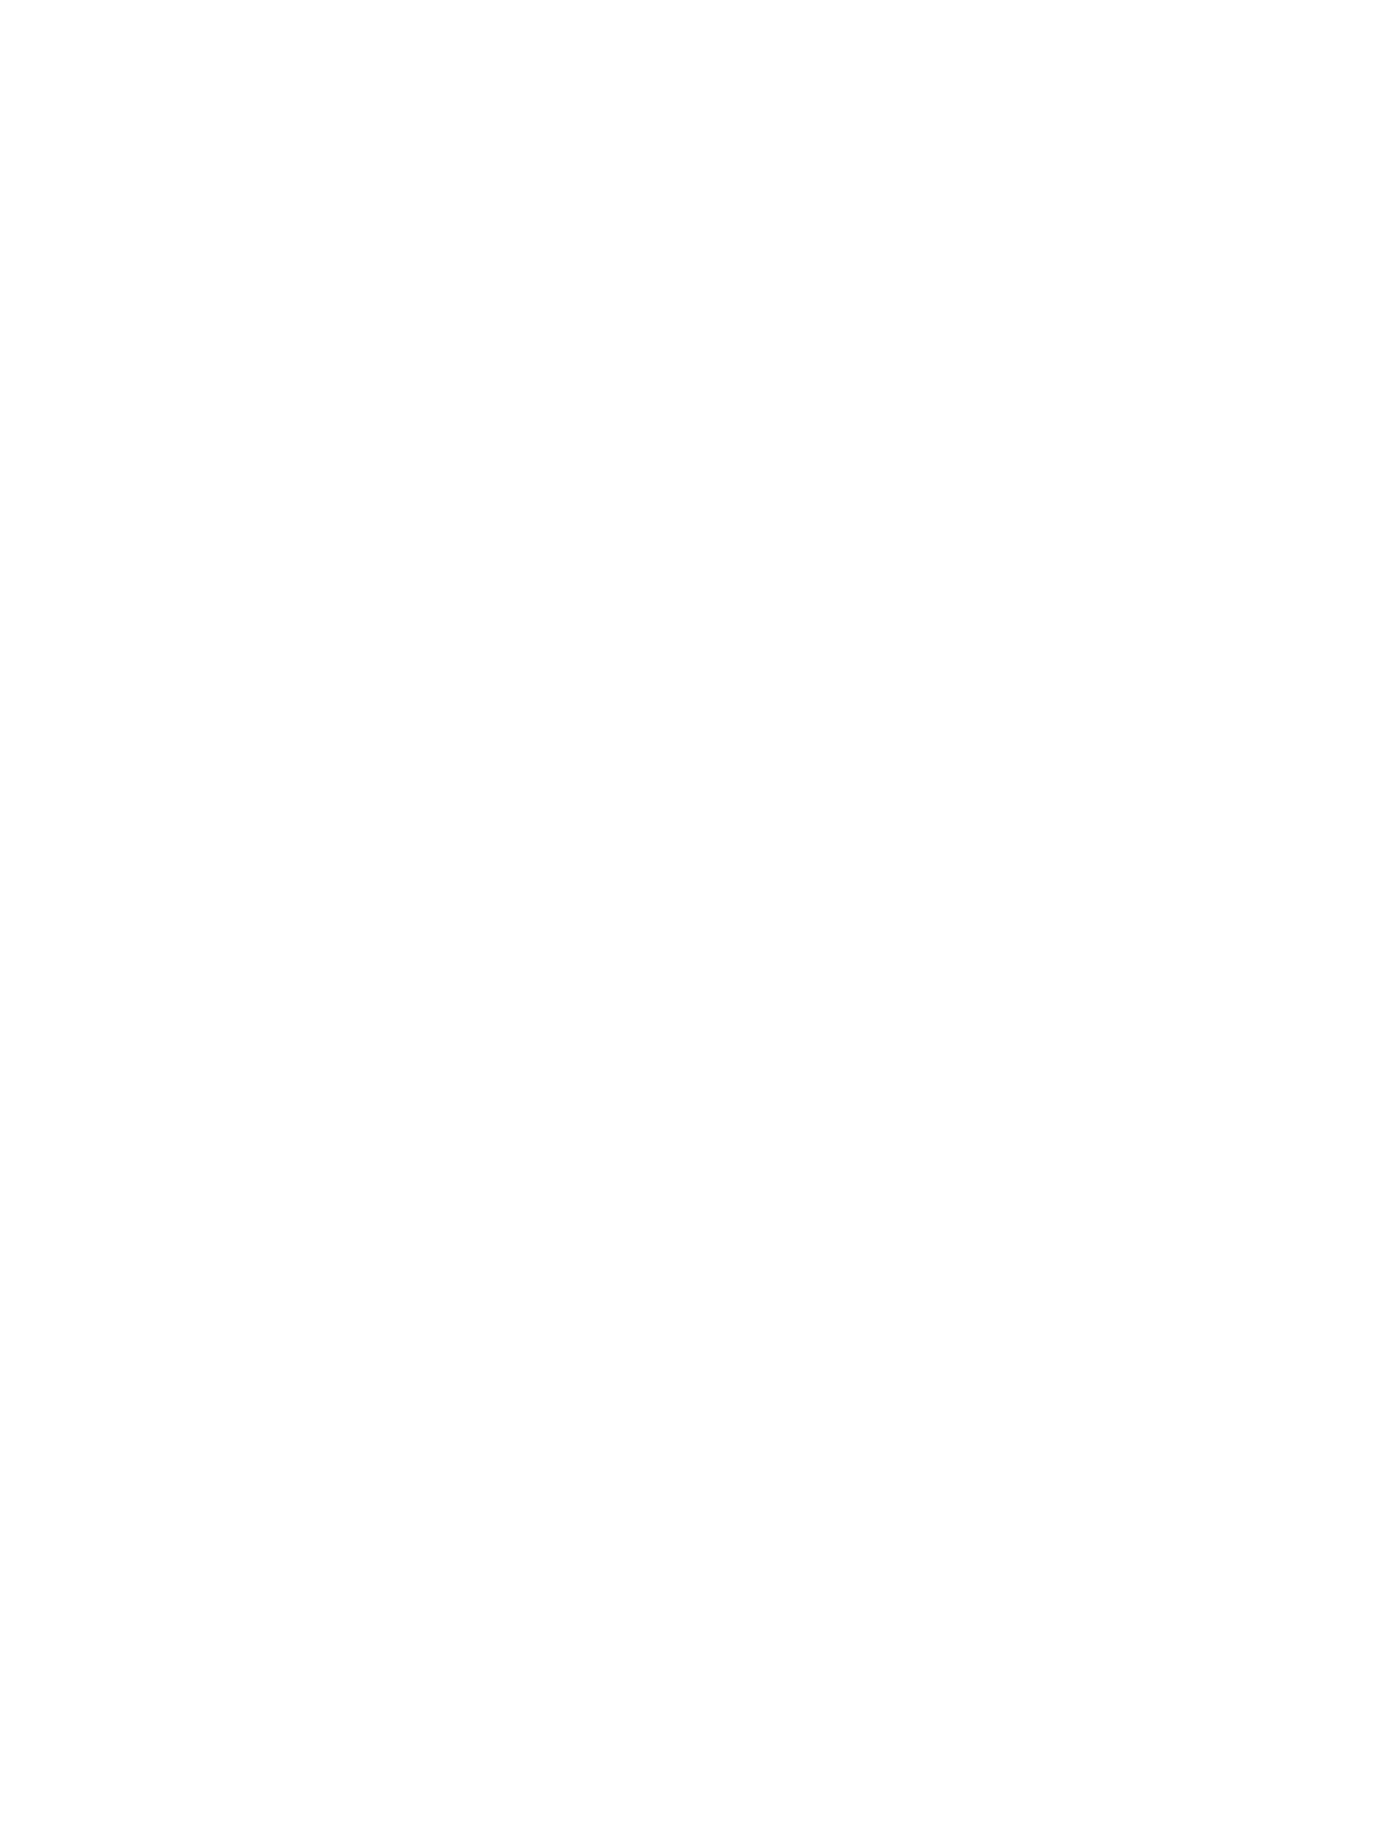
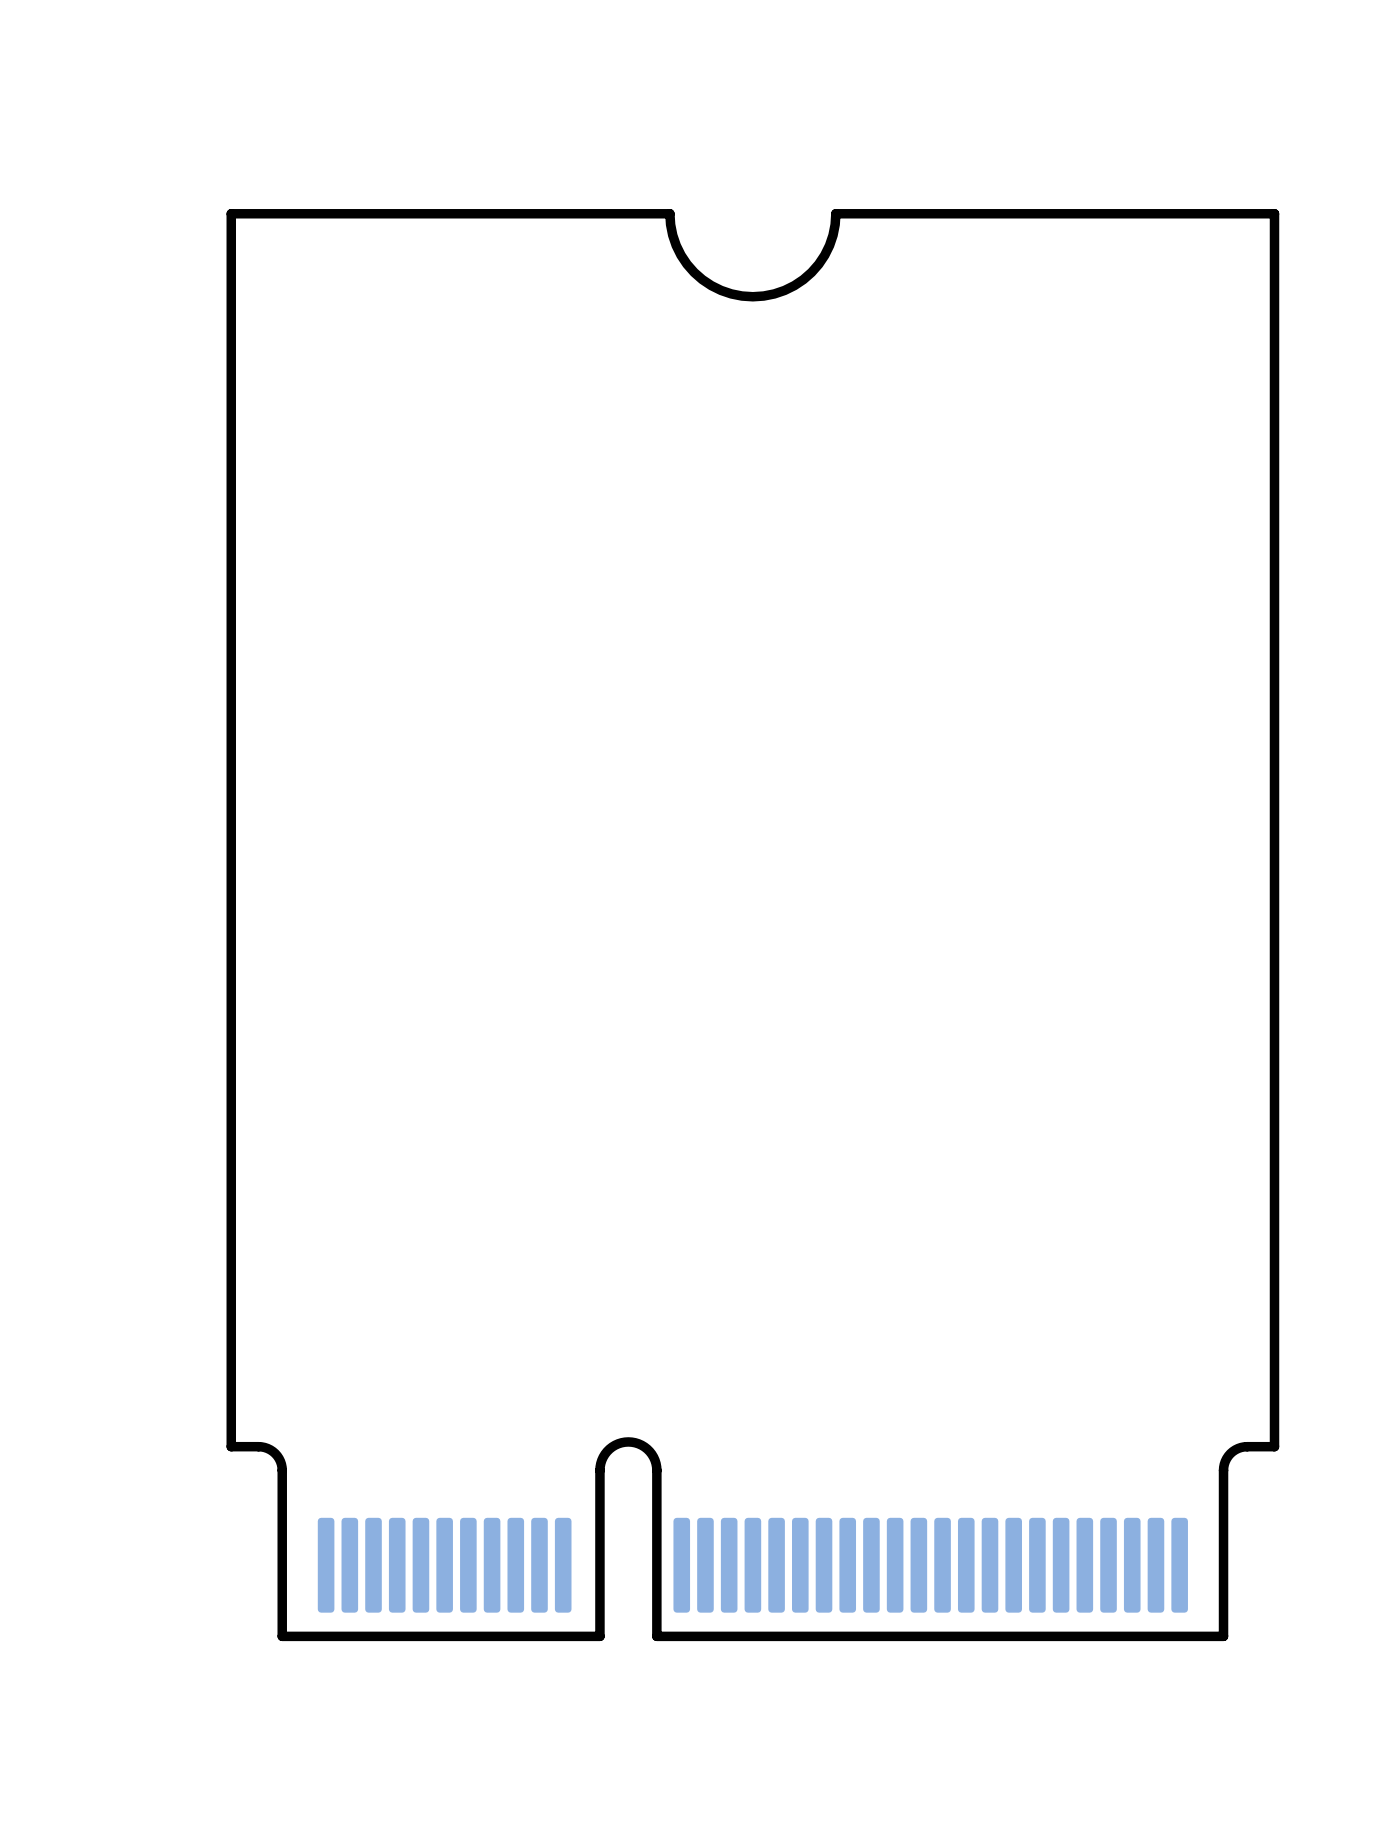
part: none -> (752, 925)

